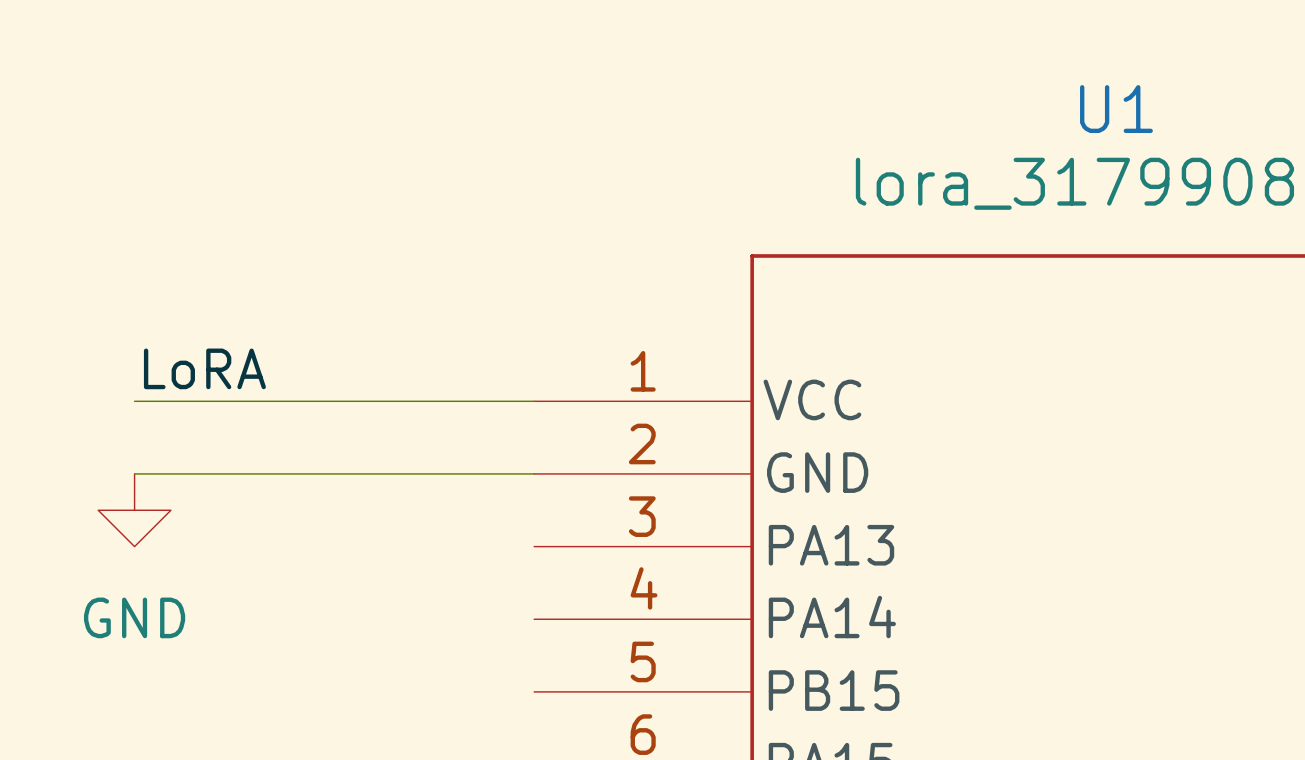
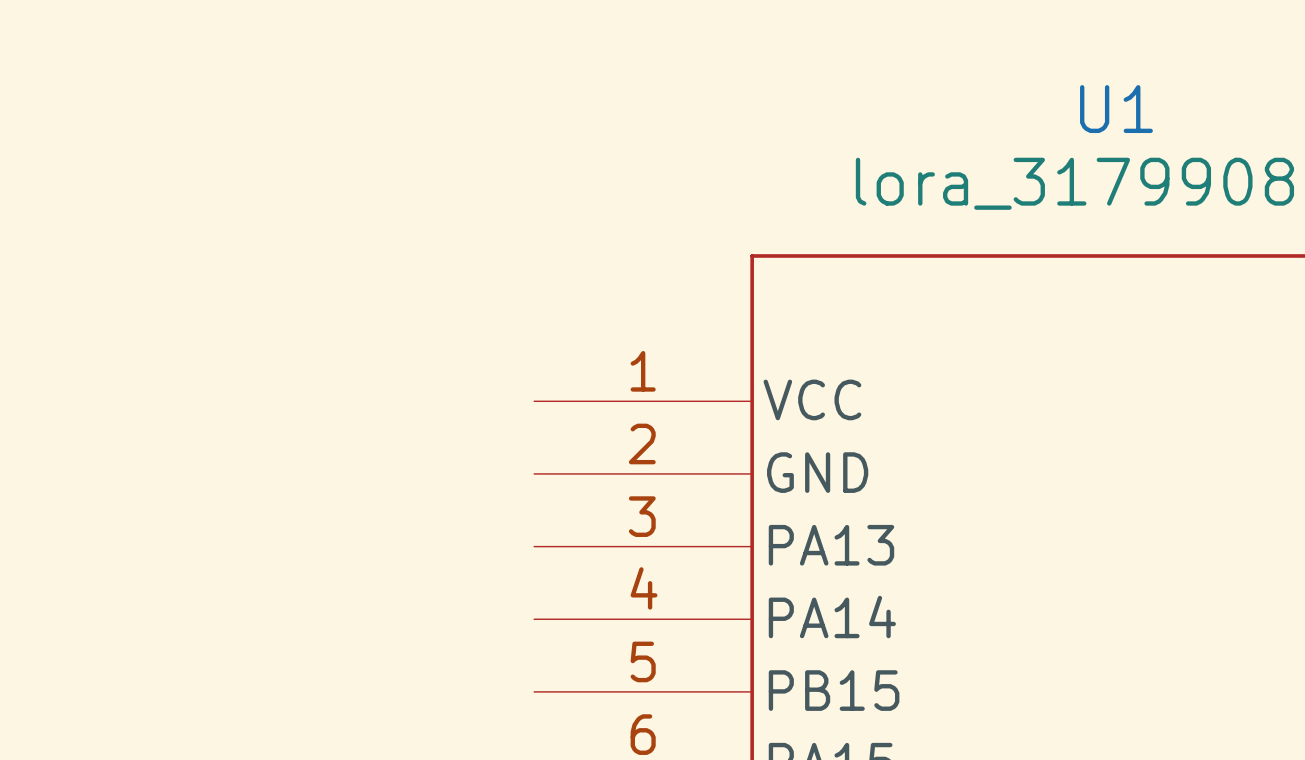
label: LoRA (204, 368) -> none
wire: (134, 401) (534, 401) -> none
wire: (134, 473) (534, 473) -> none
power symbol: GND (134, 510) -> none

